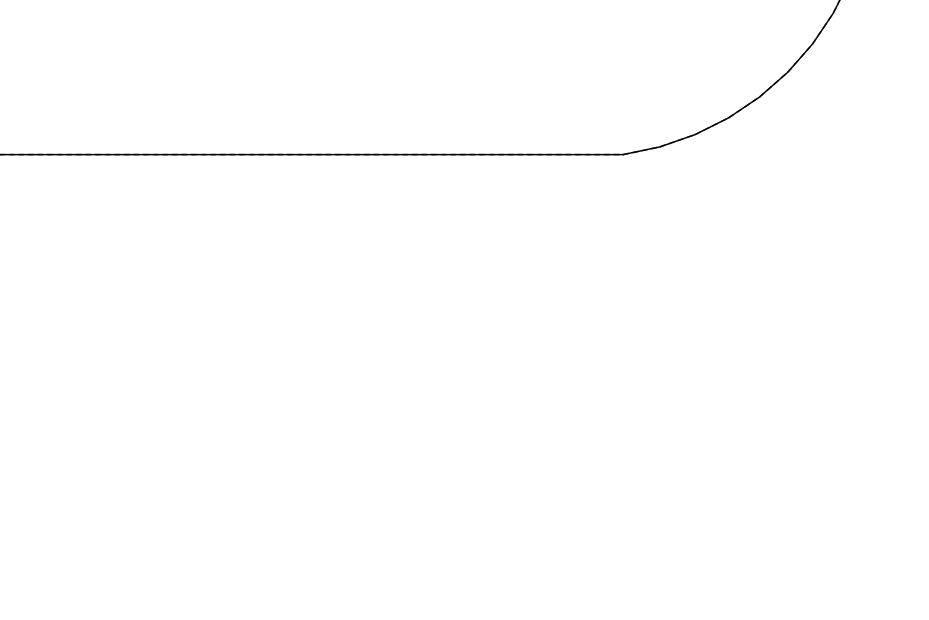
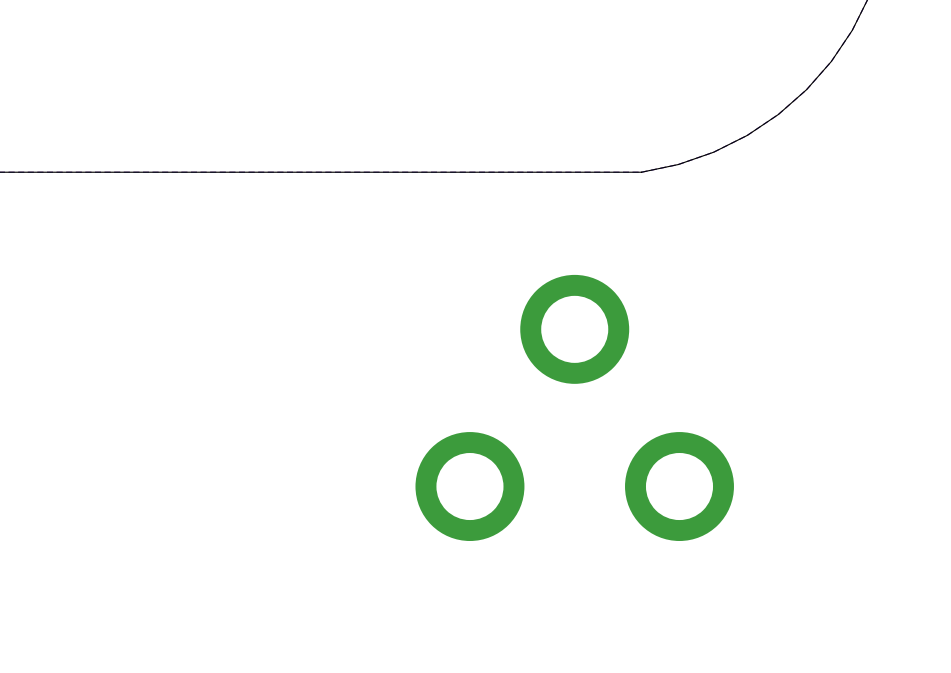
part: none -> (574, 407)

